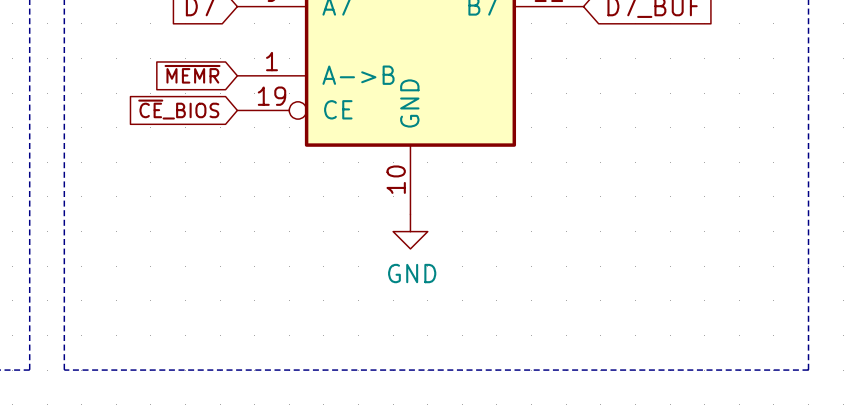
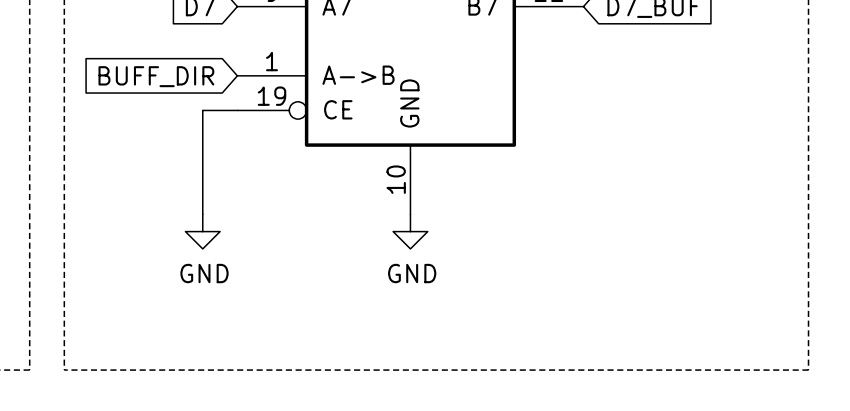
global label: ~{MEMR} (192, 74) -> BUFF_DIR (156, 76)
global label: ~{CE}_BIOS (178, 109) -> none
wire: none -> (237, 110) (202, 110) (202, 214)
power symbol: none -> GND (202, 231)

